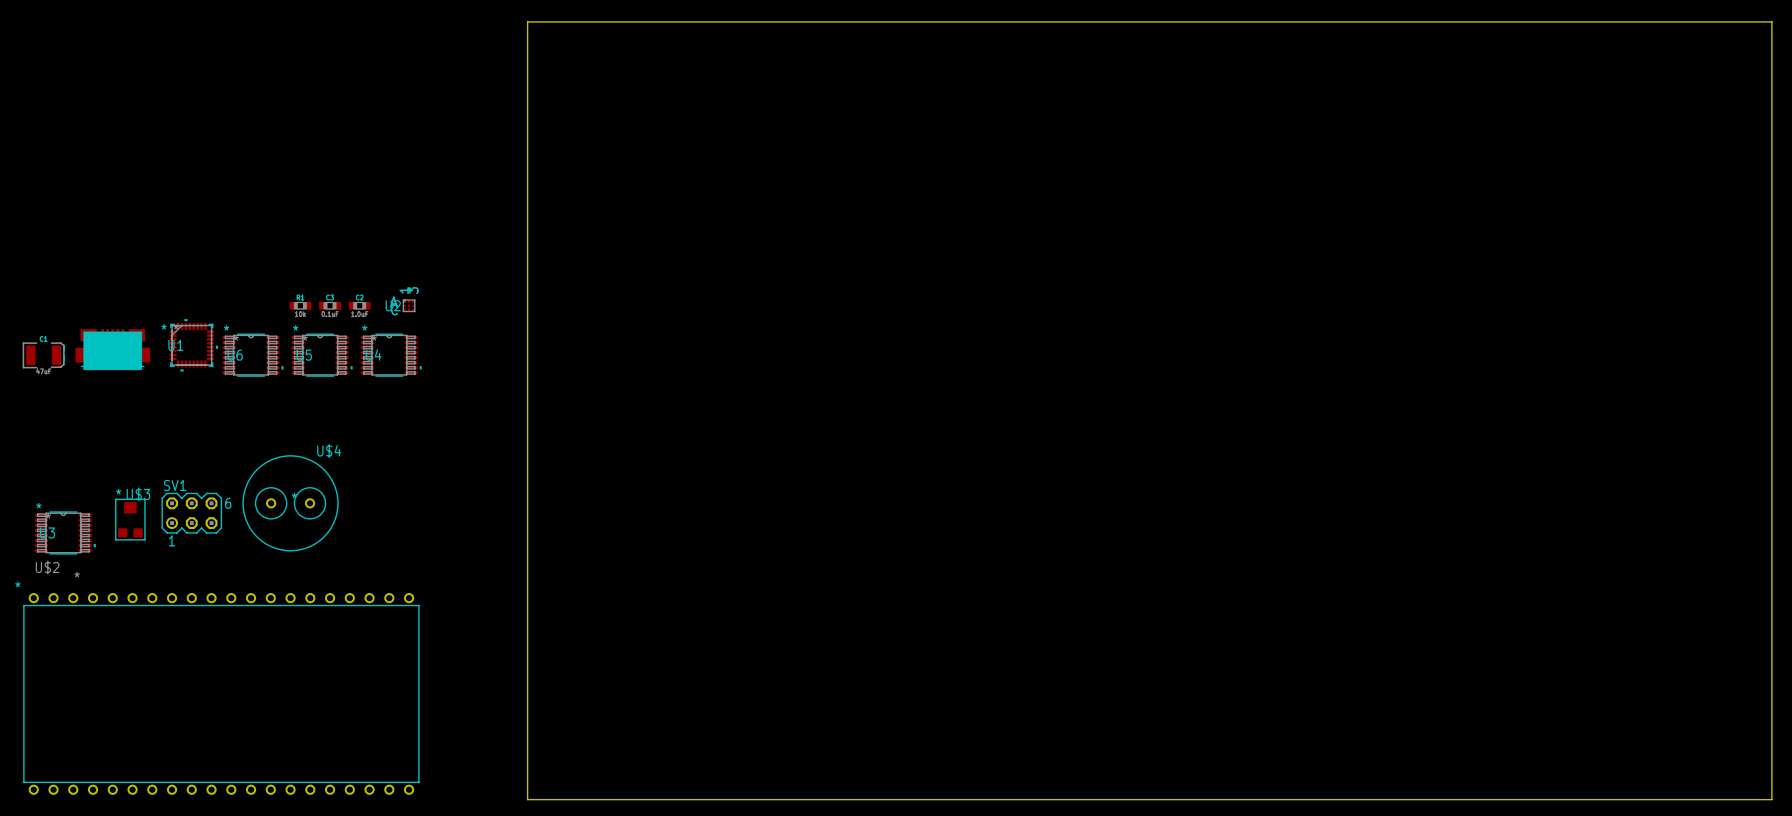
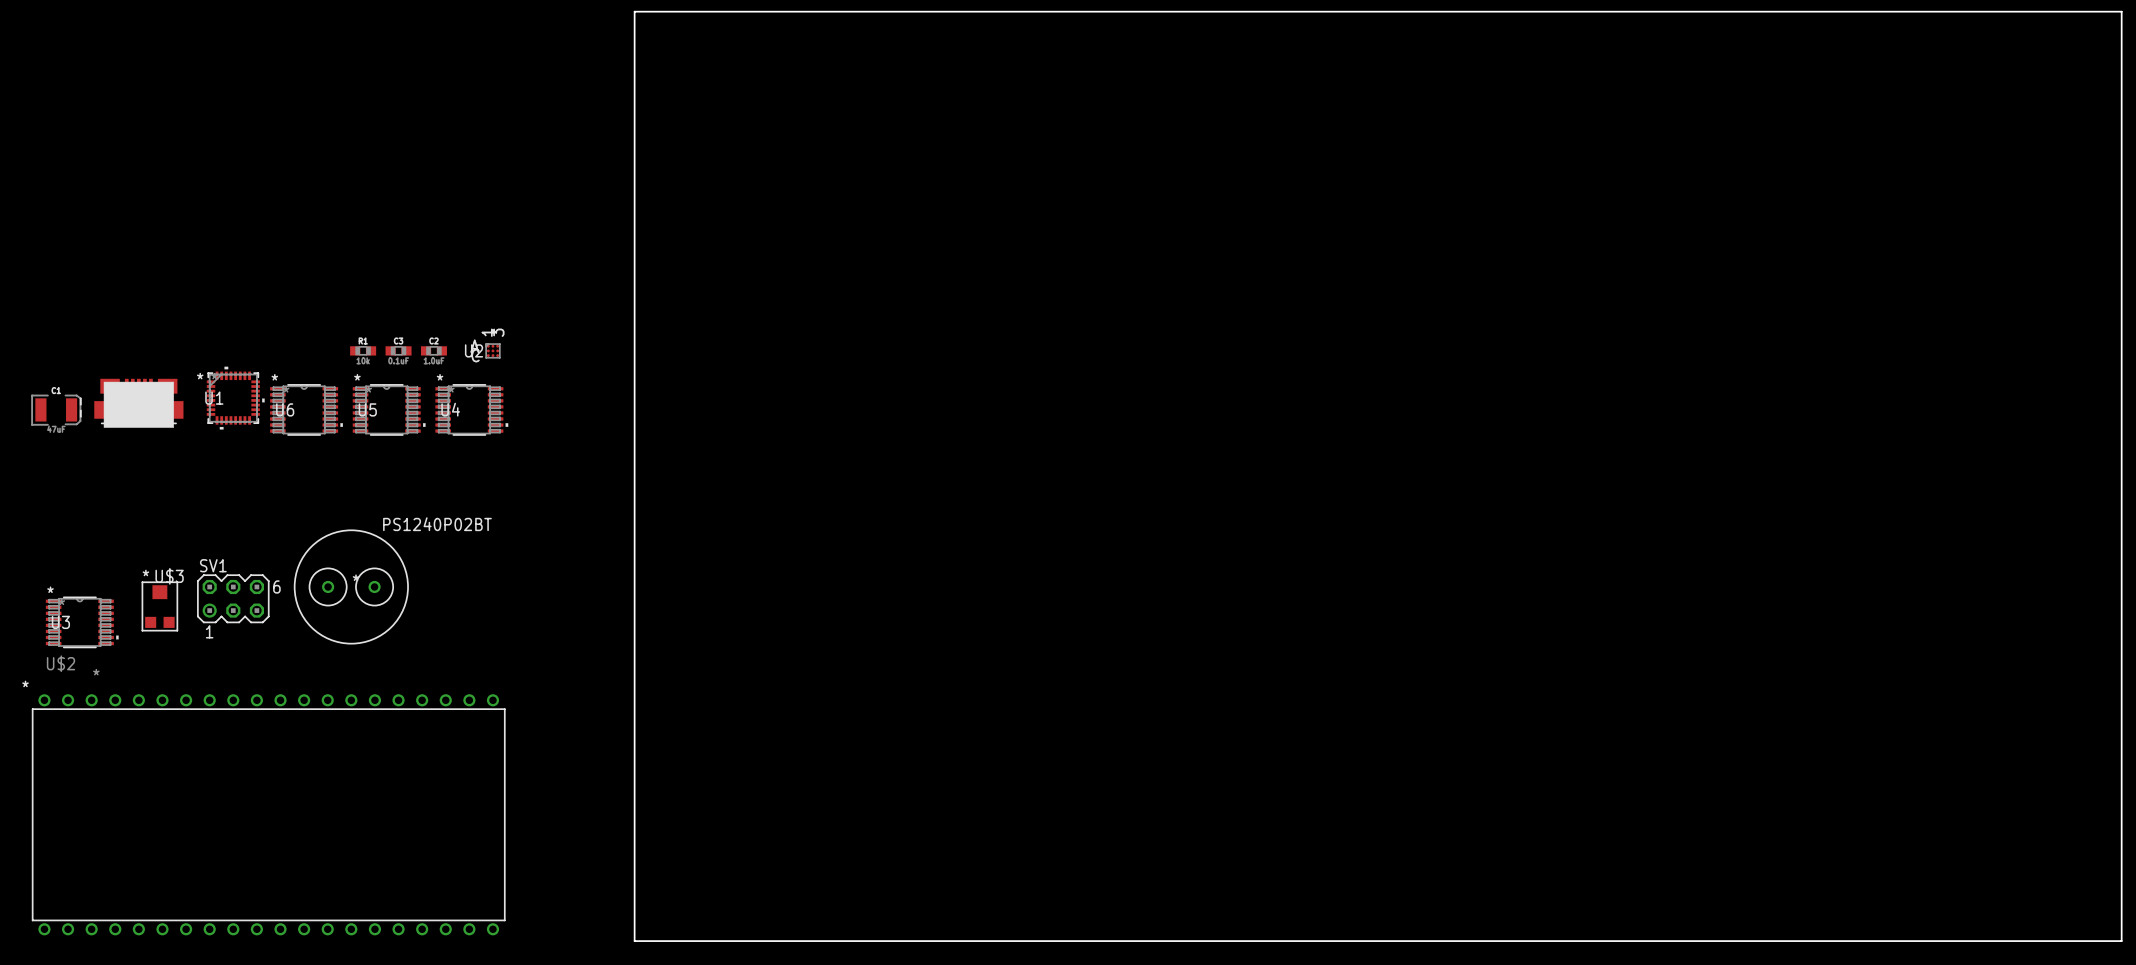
U$4 name: U$4 (329, 451) -> PS1240P02BT (437, 524)

